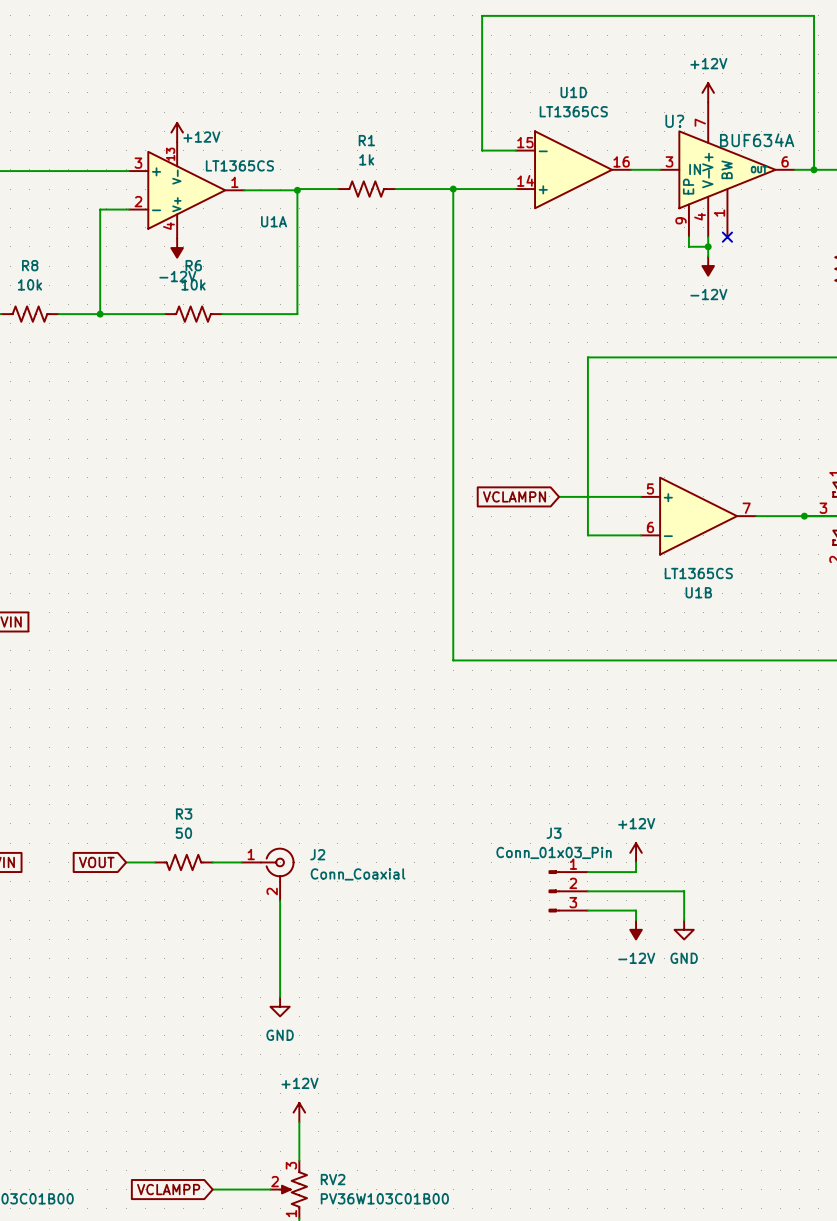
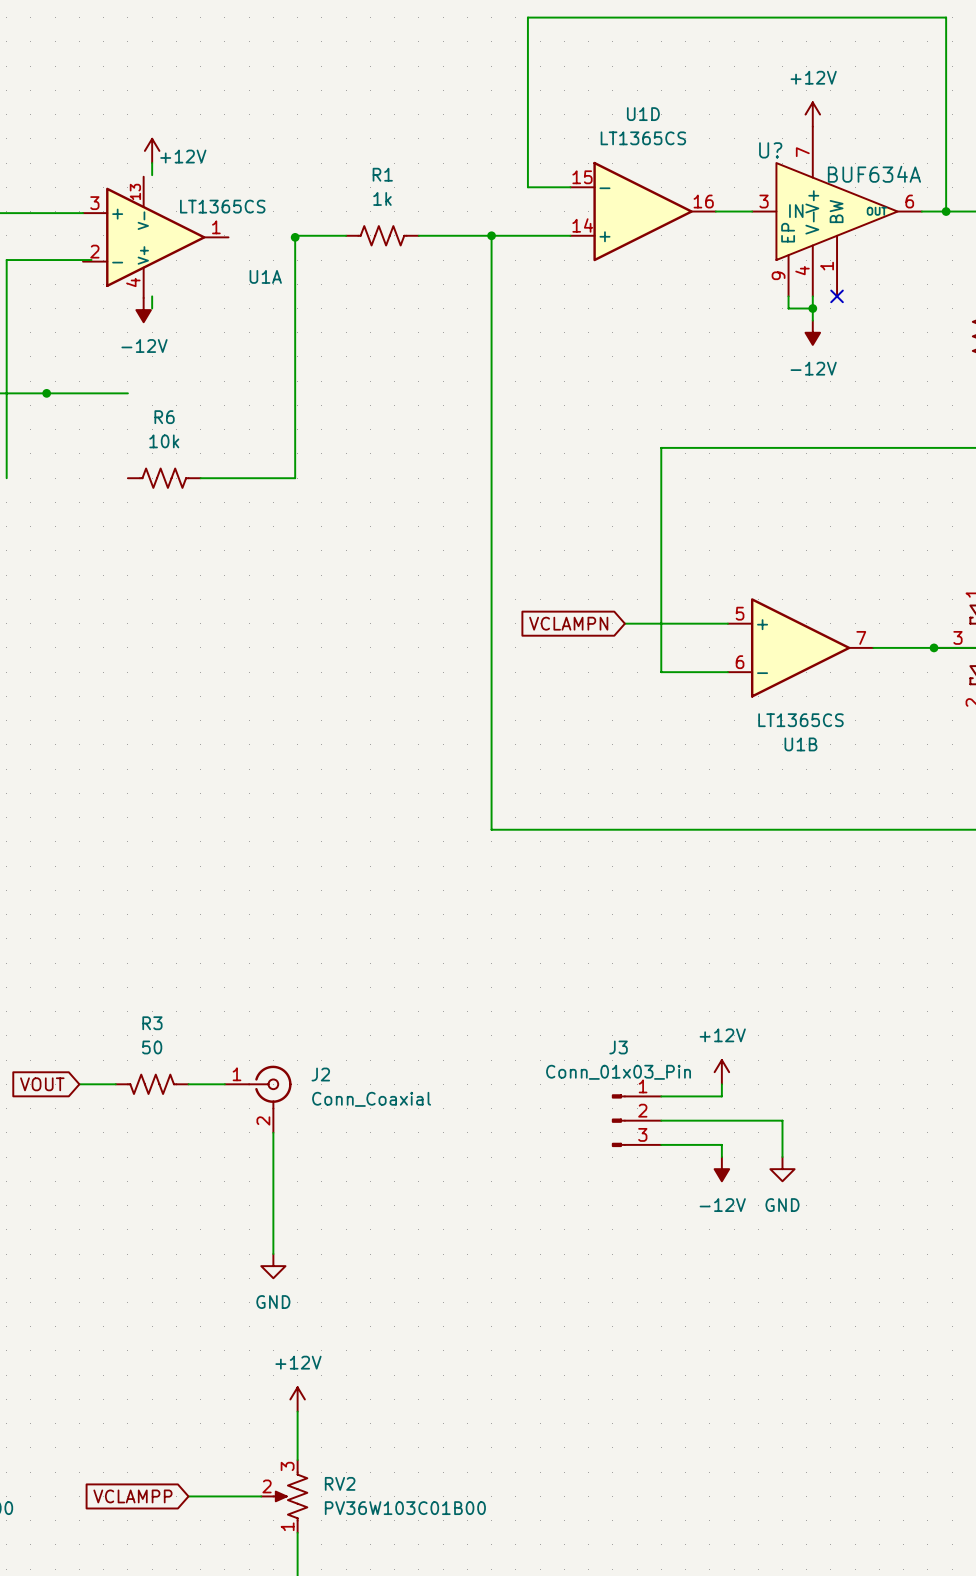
wire: none -> (152, 163) (152, 175)
power symbol position: +12V (177, 132) -> +12V (152, 150)
wire: (244, 190) (297, 190) -> none
wire: none -> (91, 260) (6, 260) (6, 478)
wire: (129, 209) (100, 209) (100, 314) -> none
wire: none -> (152, 296) (152, 308)
R6 position: (193, 314) -> (164, 478)
wire: (222, 314) (297, 314) -> (200, 478) (295, 478) (295, 393)

